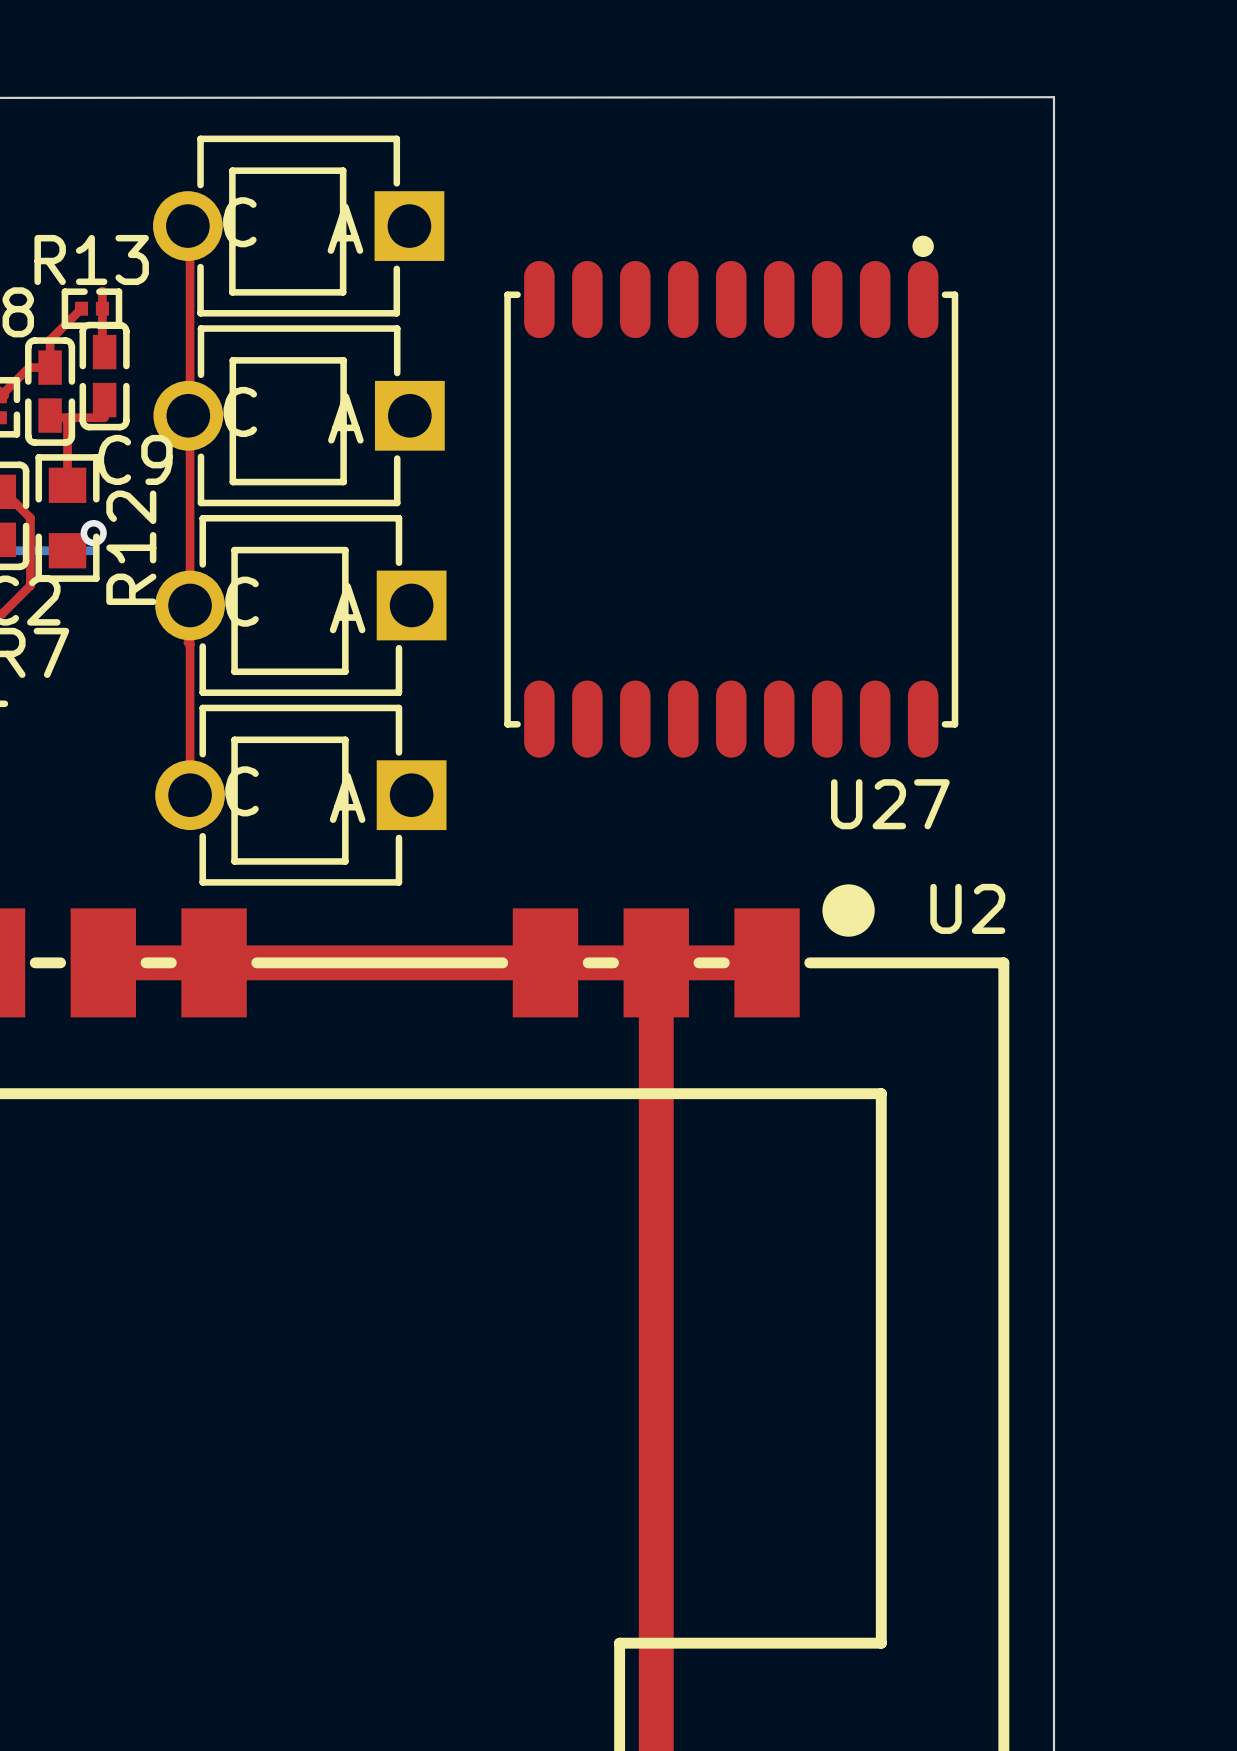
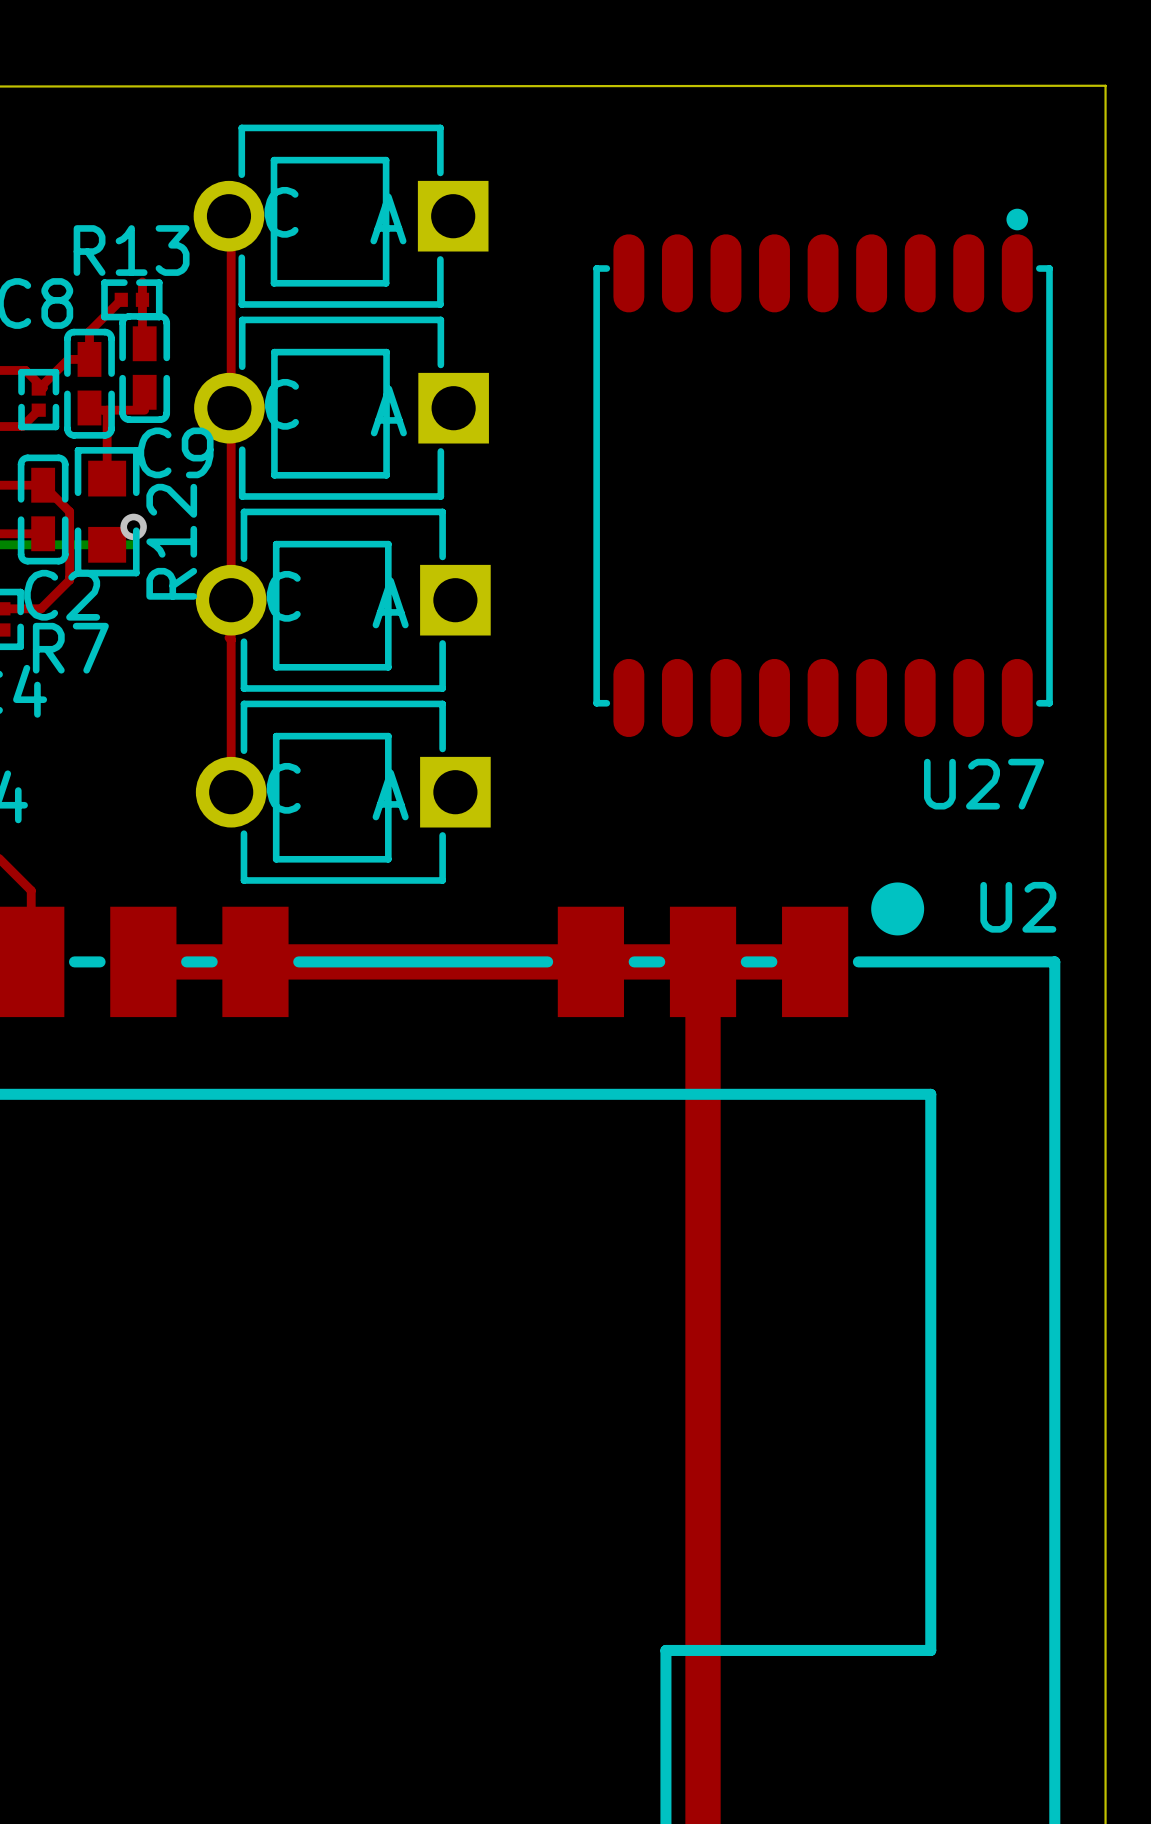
U27 position: (731, 496) -> (823, 472)

